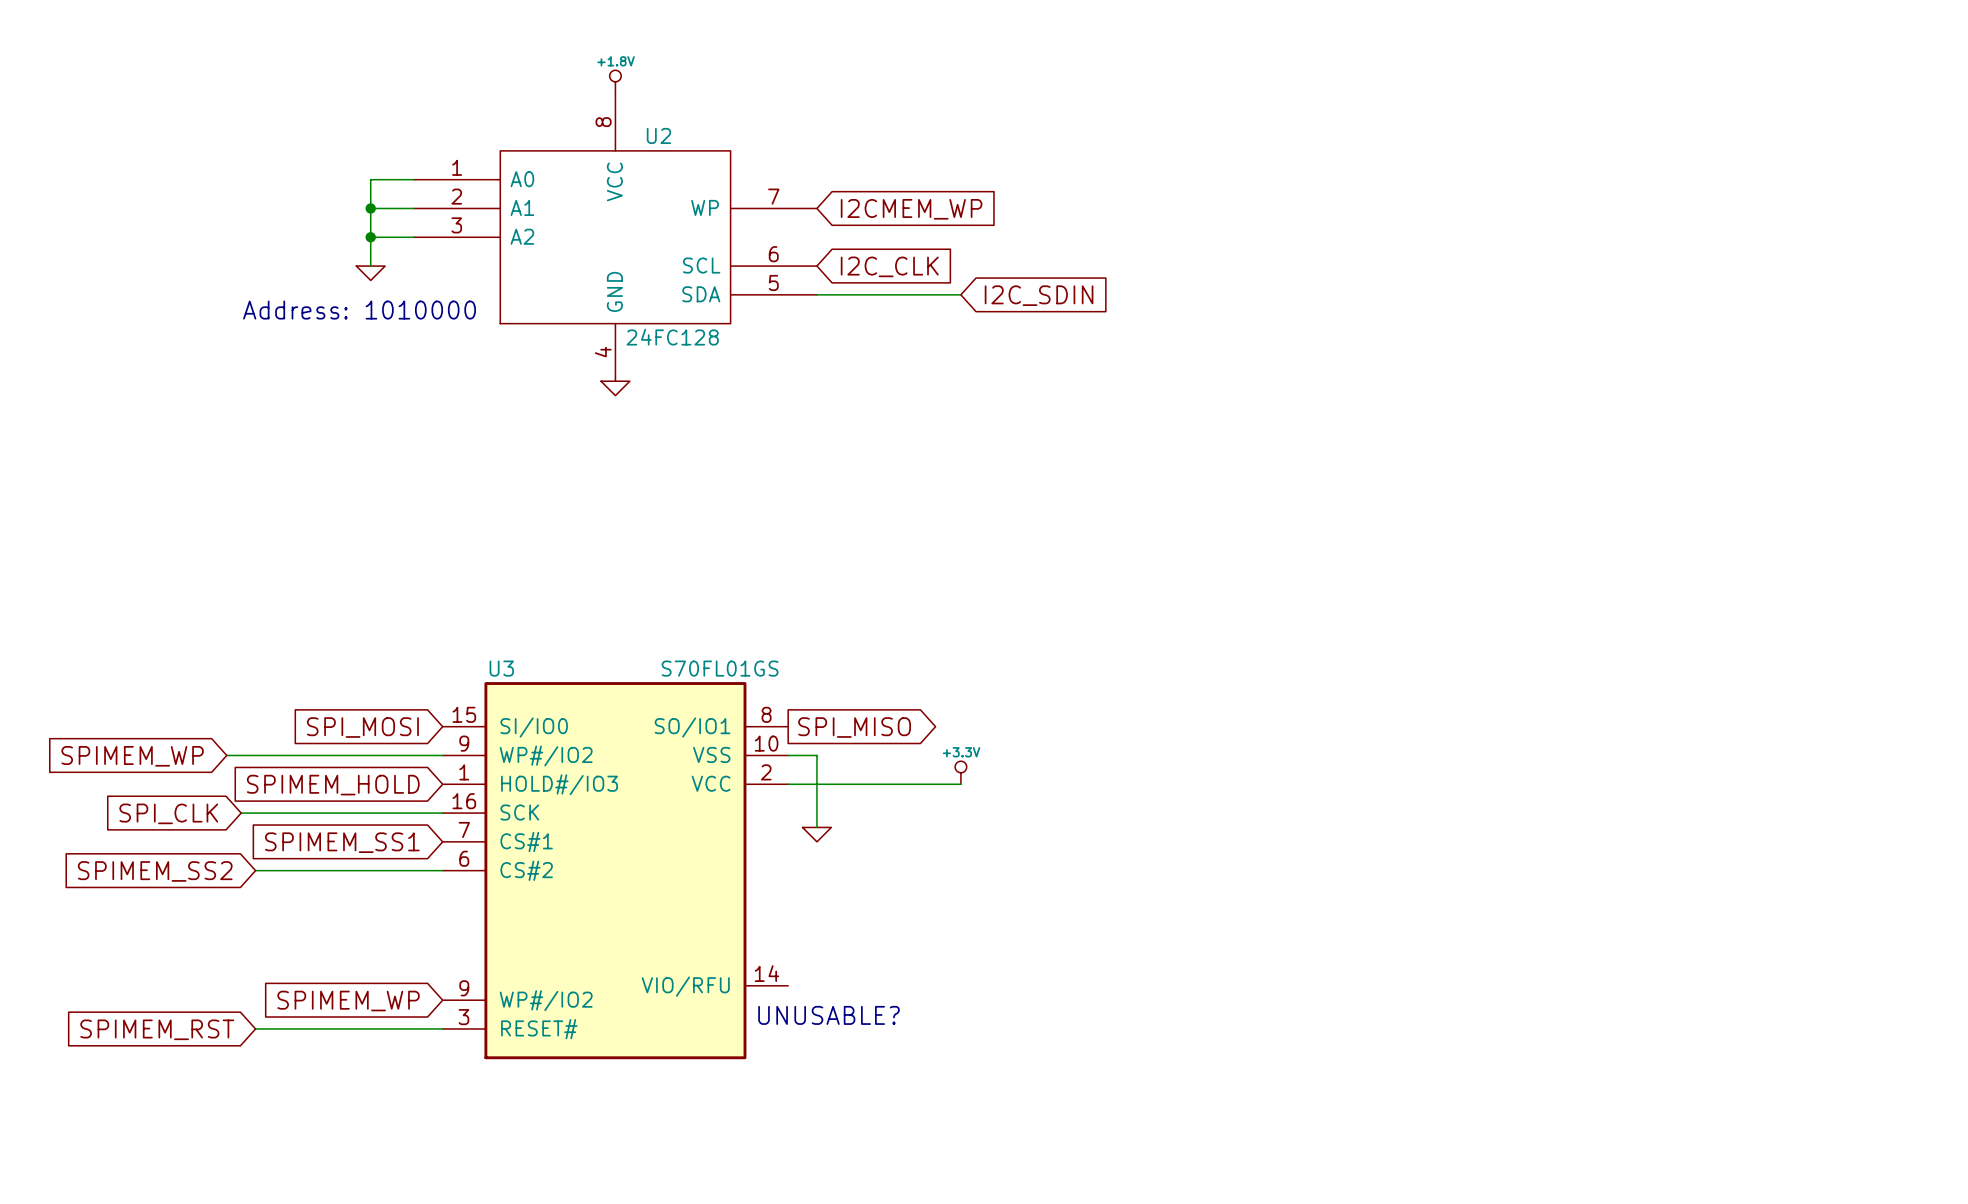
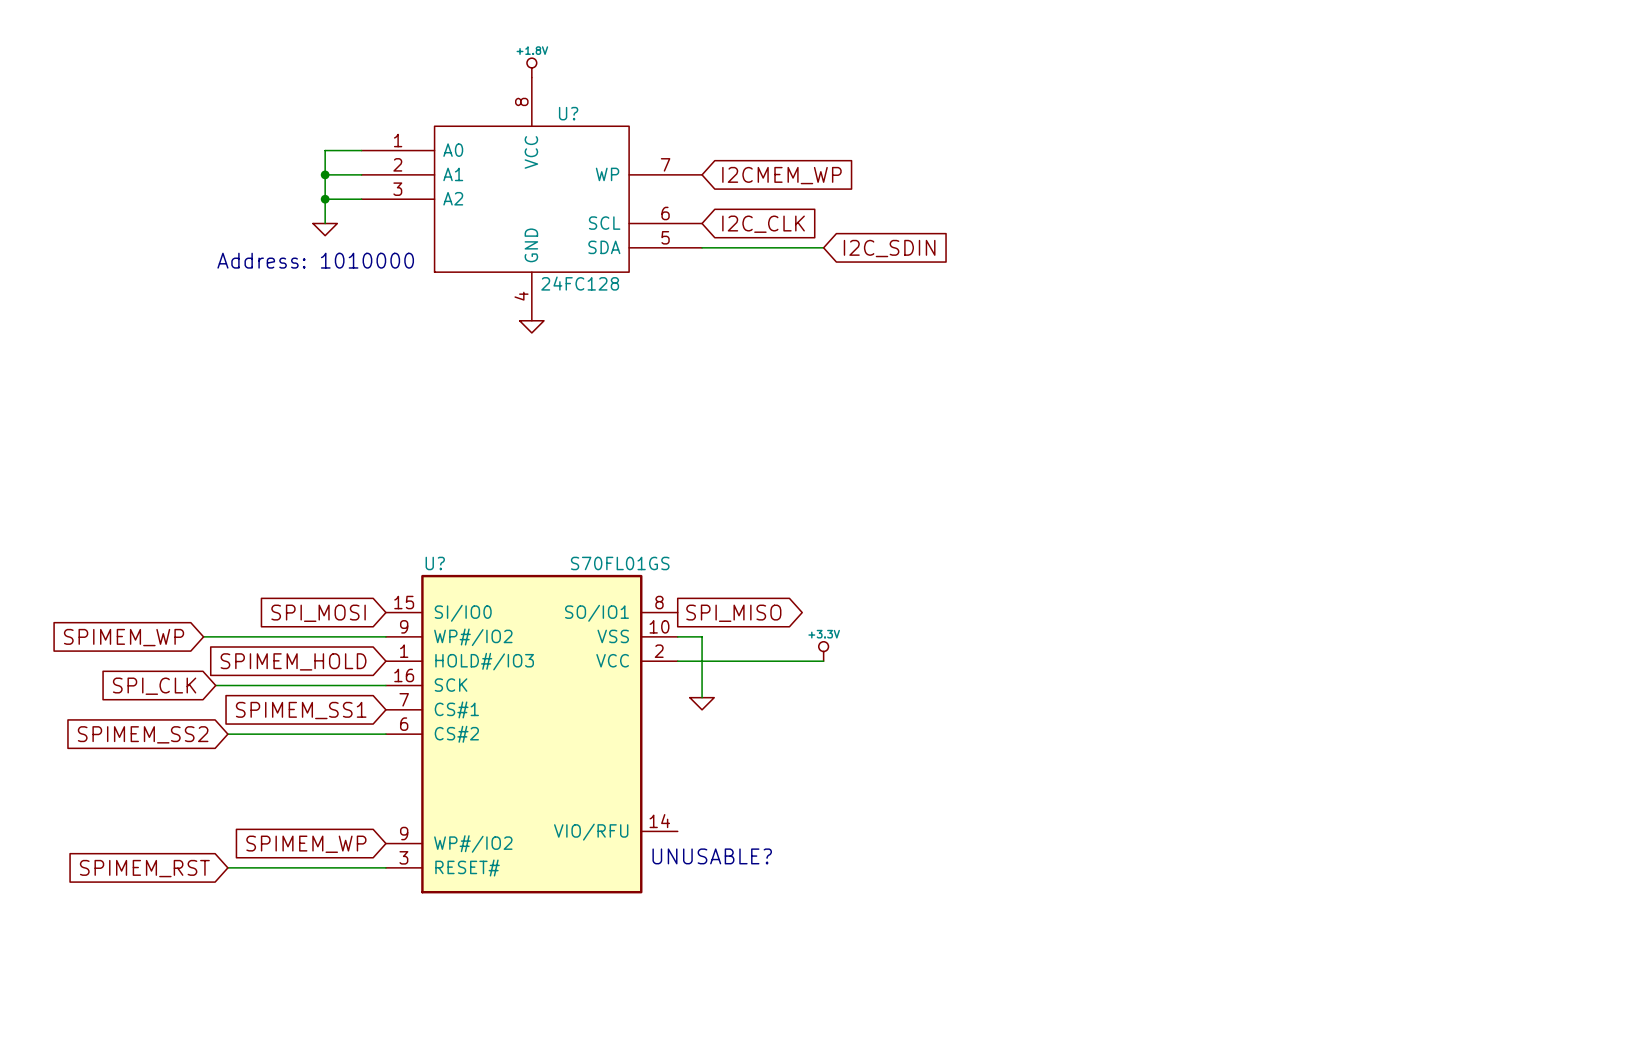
U2 name: U2 (658, 135) -> U? (568, 113)
U3 name: U3 (501, 668) -> U? (435, 563)

